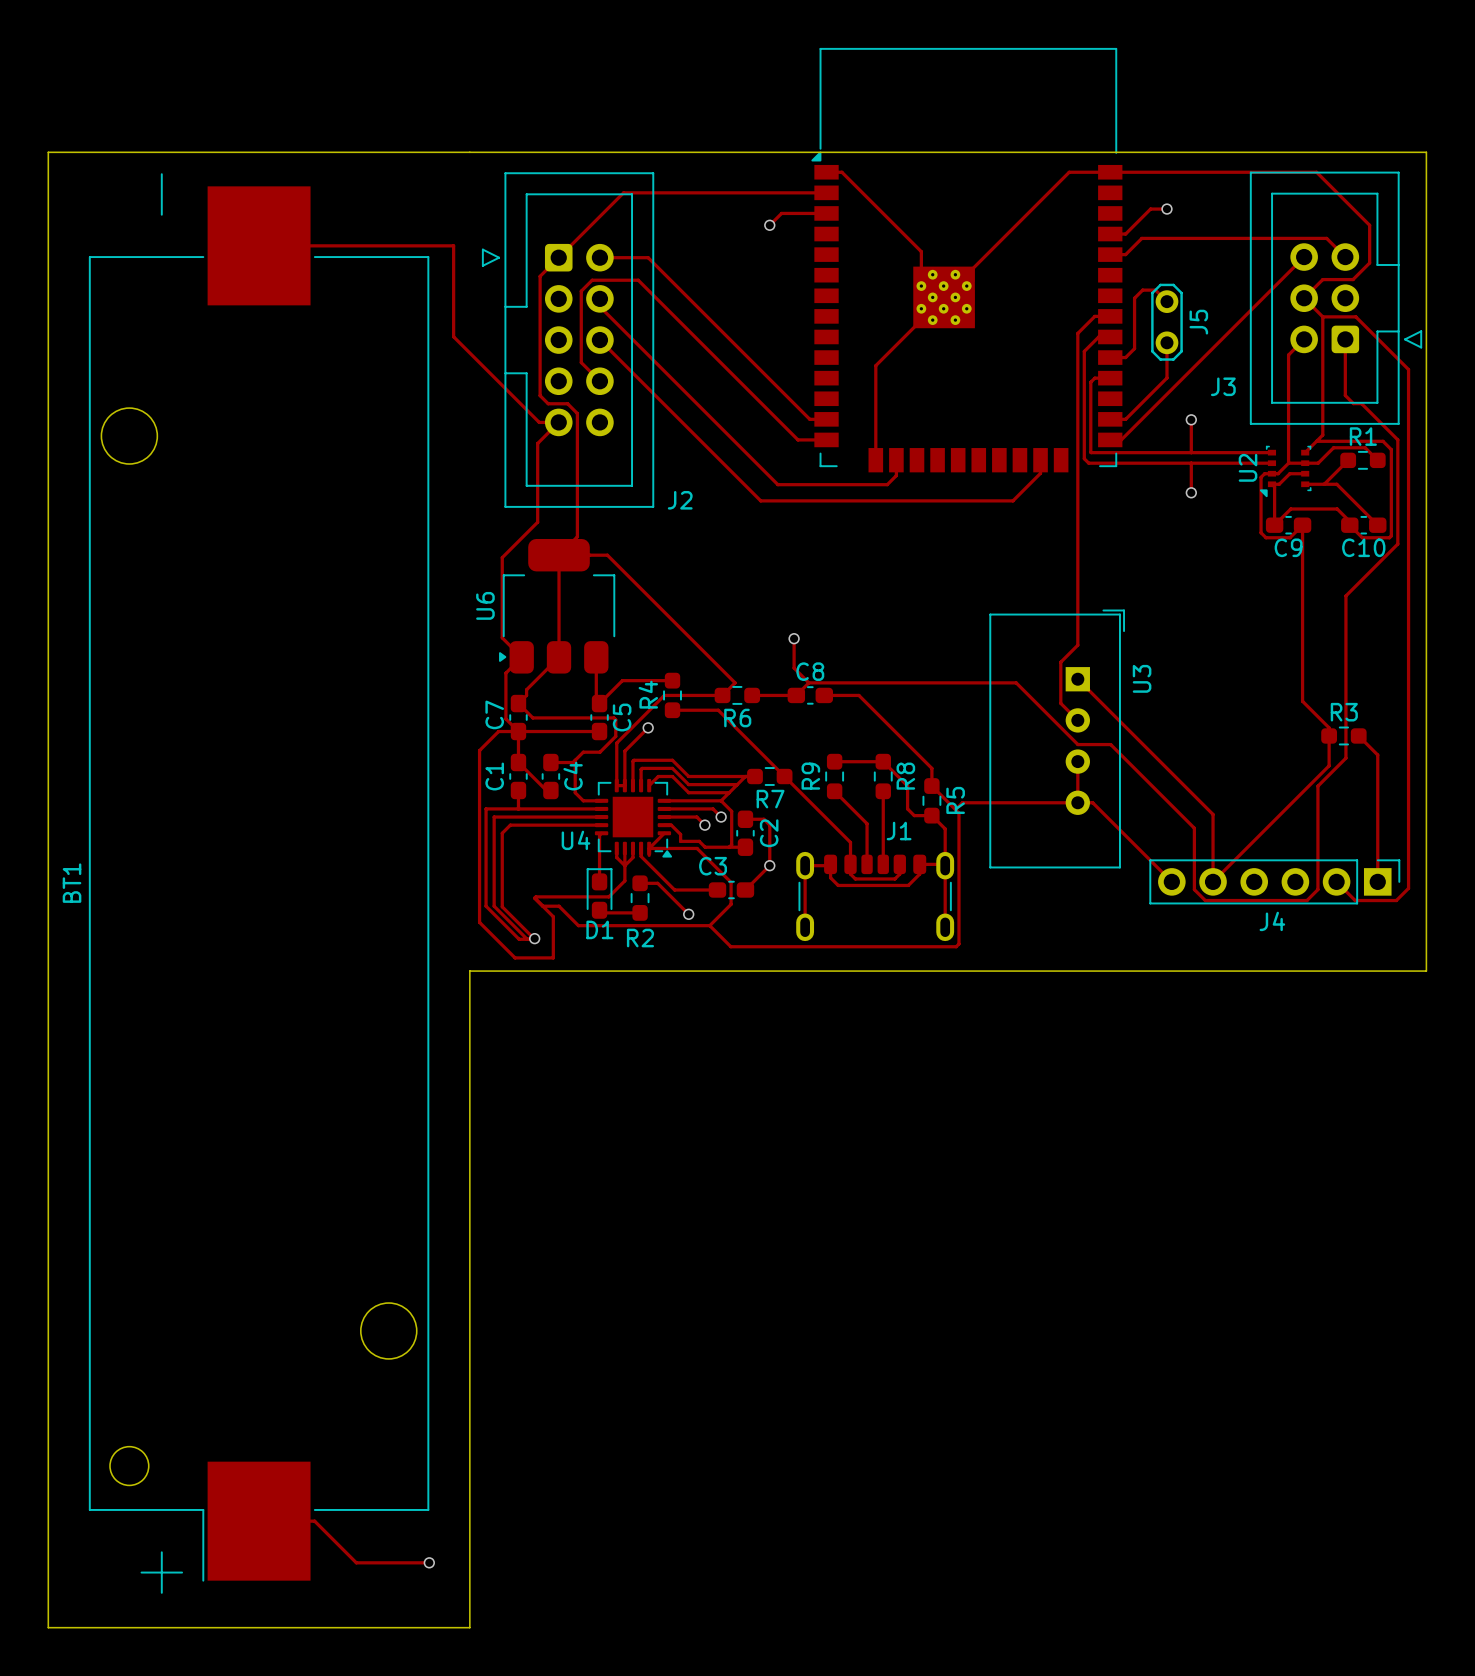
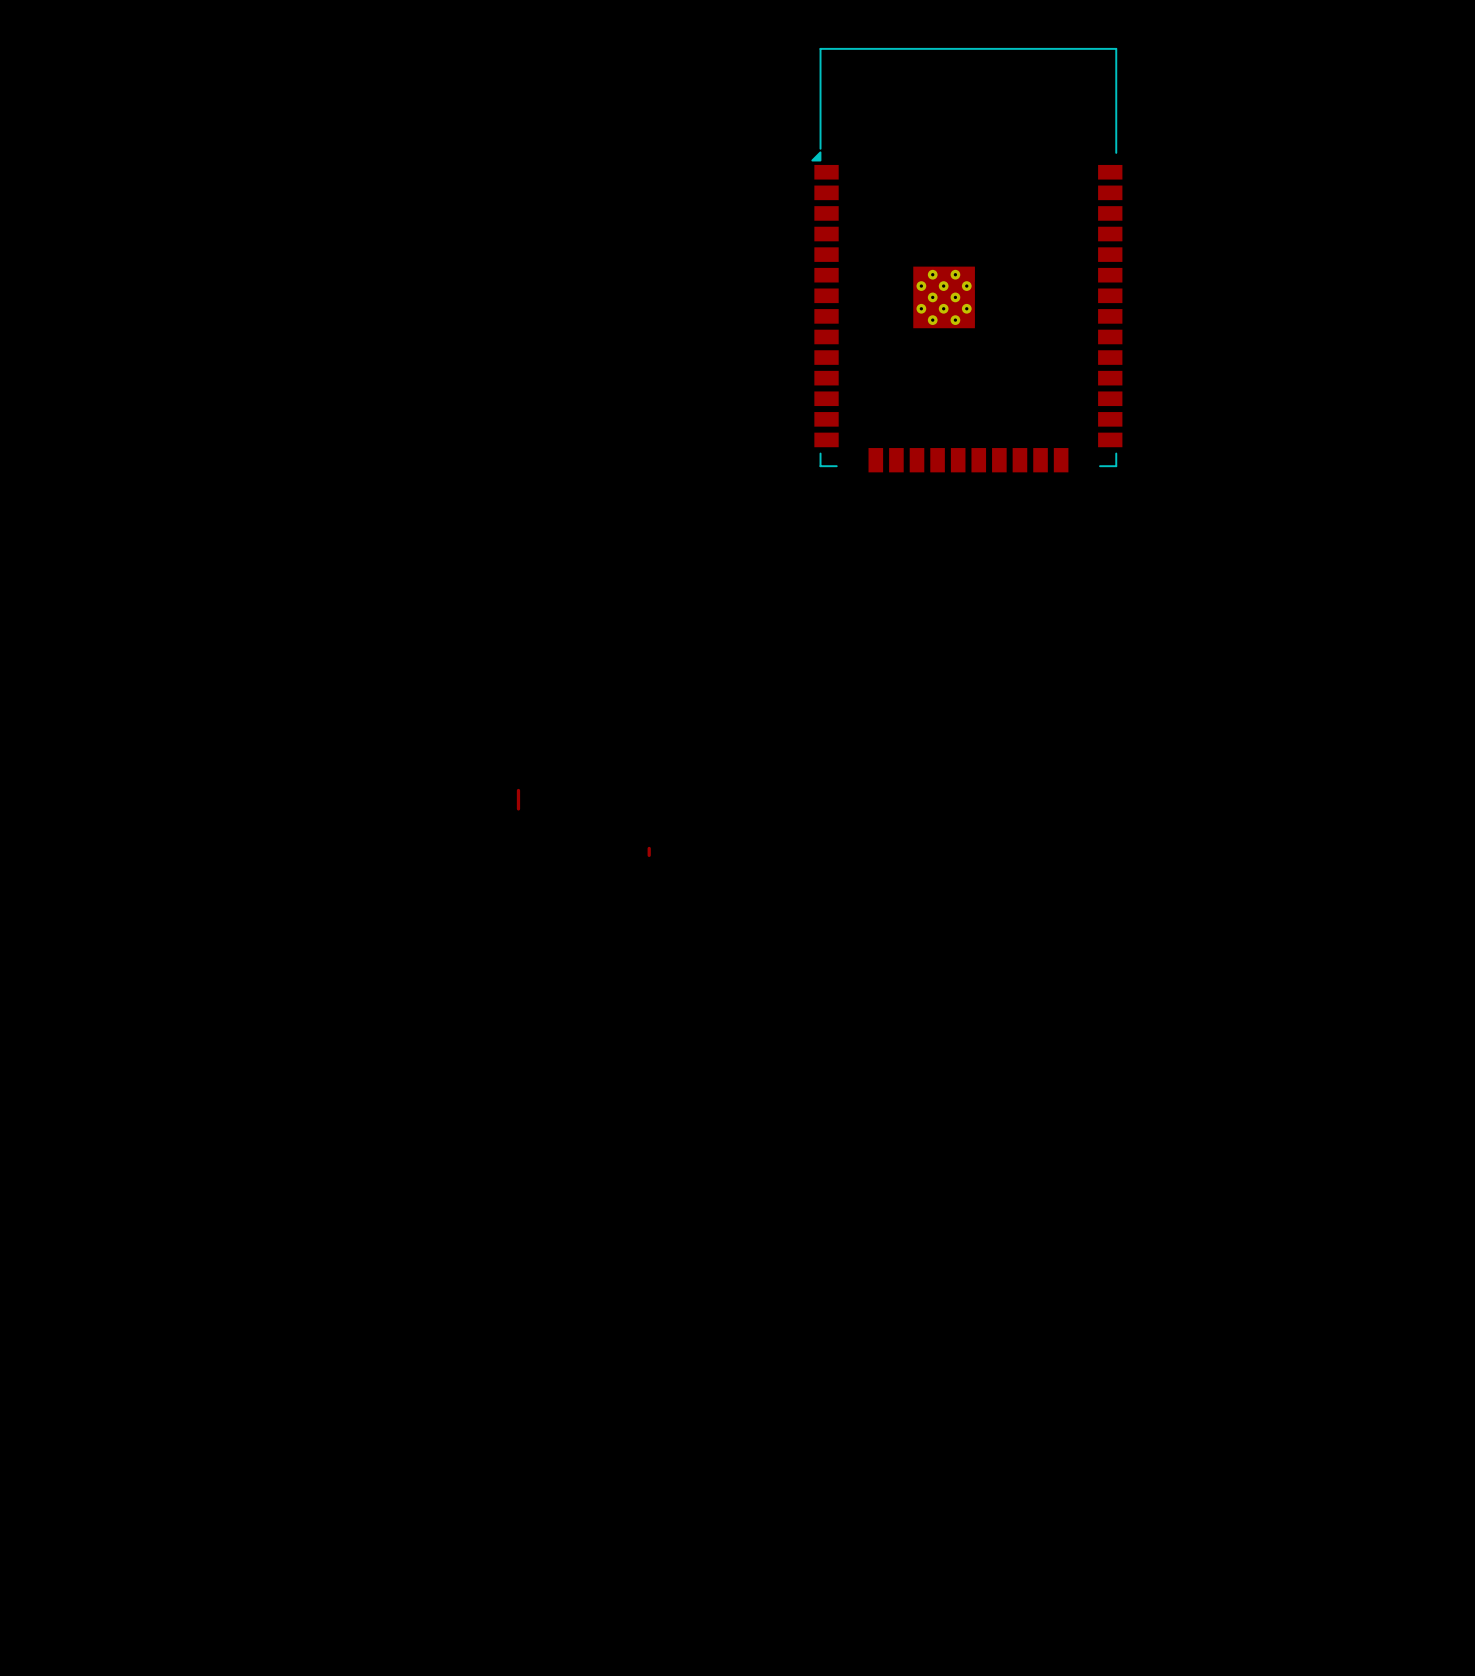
board edge: (48, 152) (1426, 152) (1426, 971) (469, 971) (469, 1627) (48, 1627) (48, 152) -> none
track: (826, 172) (841, 172) (921, 251) (921, 274) -> none
track: (826, 192) (623, 192) (540, 276) (540, 395) (548, 403) (567, 403) (577, 413) (577, 536) (559, 555) -> none
track: (1166, 209) (1150, 209) (1125, 234) (1110, 234) -> none
via: (1166, 209) -> none
track: (826, 213) (781, 213) (769, 225) -> none
via: (769, 225) -> none
track: (259, 245) (453, 245) (453, 336) (539, 422) (558, 422) (537, 443) (537, 522) (502, 557) (502, 637) (521, 657) (505, 673) (505, 718) (518, 731) (518, 762) (546, 790) (550, 790) -> none
track: (1110, 254) (1125, 254) (1141, 238) (1326, 238) (1345, 257) -> none
track: (599, 257) (648, 257) (809, 419) (826, 419) -> none
track: (1304, 257) (1121, 439) (1110, 439) -> none
track: (966, 274) (1069, 172) (1316, 172) (1369, 225) (1369, 262) (1353, 279) (1322, 279) (1304, 298) (1322, 316) -> none
track: (599, 298) (599, 306) (777, 484) (887, 484) (896, 475) (896, 460) -> none
J3: (1336, 298) -> none
track: (1166, 301) (1155, 290) (1142, 290) (1134, 298) (1134, 348) (1125, 357) (1110, 357) -> none
track: (1110, 316) (1094, 316) (1077, 333) (1077, 645) (1060, 662) (1060, 703) (1077, 720) -> none
track: (1322, 316) (1355, 316) (1408, 369) (1408, 888) (1396, 900) (1355, 900) (1336, 881) -> none
track: (1322, 316) (1322, 435) (1305, 452) -> none
track: (921, 320) (875, 365) (875, 460) -> none
J5: (1166, 322) -> none
track: (1110, 336) (1098, 336) (1084, 351) (1084, 458) (1088, 463) (1271, 463) -> none
track: (1304, 339) (1288, 354) (1288, 463) -> none
track: (1345, 339) (1345, 395) (1353, 403) (1361, 403) (1397, 439) (1397, 544) (1345, 595) (1345, 758) (1317, 786) (1317, 889) (1307, 900) (1205, 900) (1194, 889) (1194, 828) (1110, 744) (1077, 744) (1016, 682) (808, 682) -> none
J2: (568, 340) -> none
track: (599, 340) (760, 500) (1012, 500) (1040, 473) (1040, 460) -> none
track: (1166, 342) (1166, 377) (1125, 419) (1110, 419) -> none
track: (1110, 378) (1094, 378) (1090, 382) (1091, 452) (1271, 452) -> none
track: (599, 381) (581, 362) (581, 291) (592, 280) (638, 280) (797, 439) (826, 439) -> none
track: (1191, 419) (1191, 452) -> none
via: (1191, 419) -> none
track: (1316, 441) (1383, 441) (1391, 449) (1391, 535) (1389, 537) (1362, 537) (1337, 508) (1290, 508) (1274, 525) (1274, 486) (1271, 484) (1279, 484) (1289, 473) (1305, 473) -> none
track: (1348, 460) (1324, 484) -> none
R1: (1362, 460) -> none
track: (1377, 460) (1365, 447) (1333, 447) (1318, 463) (1288, 463) -> none
track: (1191, 463) (1191, 492) -> none
track: (1288, 463) (1278, 473) (1264, 473) (1261, 477) (1261, 532) (1266, 537) (1290, 537) (1302, 525) (1302, 701) (1329, 727) (1329, 765) (1213, 881) (1213, 814) (1077, 679) -> none
U2: (1285, 471) -> none
track: (1305, 484) (1336, 484) (1377, 525) -> none
via: (1191, 492) -> none
C9: (1288, 525) -> none
C10: (1363, 525) -> none
track: (559, 555) (559, 657) (526, 689) (526, 695) (518, 703) (532, 717) (613, 717) (615, 719) (615, 736) (600, 752) (583, 752) (572, 762) (550, 762) -> none
track: (559, 555) (607, 555) (735, 682) (722, 695) (664, 695) (616, 743) (616, 785) (624, 785) (624, 751) (648, 727) -> none
U6: (557, 606) -> none
track: (794, 638) (794, 668) (808, 682) -> none
via: (794, 638) -> none
track: (596, 657) (596, 700) (599, 703) (622, 680) (672, 680) -> none
track: (808, 682) (796, 695) (752, 695) -> none
R4: (672, 695) -> none
R6: (737, 695) -> none
C8: (810, 695) -> none
track: (824, 695) (858, 695) (931, 768) (931, 786) (958, 813) (958, 943) (956, 946) (730, 946) (709, 925) -> none
track: (673, 711) (672, 710) (718, 710) (850, 842) (850, 874) (855, 878) (894, 878) (899, 874) (899, 857) -> none
C7: (518, 717) -> none
C5: (599, 717) -> none
via: (648, 727) -> none
track: (599, 731) (498, 731) (479, 750) (479, 922) (515, 957) (553, 957) (553, 916) (534, 898) (608, 896) (624, 880) (624, 848) -> none
R3: (1343, 735) -> none
track: (1358, 735) (1377, 755) (1377, 881) -> none
U3: (1057, 738) -> none
track: (575, 760) (575, 792) (583, 800) (601, 800) -> none
track: (834, 761) (883, 761) (907, 786) (907, 808) (914, 815) (931, 815) (945, 828) (945, 927) -> none
track: (1077, 761) (1077, 802) -> none
C1: (518, 776) -> none
C4: (550, 776) -> none
track: (745, 776) (721, 800) -> none
track: (754, 776) (688, 776) (672, 760) (633, 760) (632, 785) -> none
R7: (769, 776) -> none
R9: (834, 776) -> none
R8: (883, 776) -> none
track: (737, 784) (688, 784) (672, 768) (642, 768) (641, 785) -> none
track: (649, 785) (658, 776) (672, 776) (688, 792) (729, 792) -> none
track: (834, 791) (867, 823) (867, 864) -> none
track: (883, 791) (883, 864) -> none
track: (664, 800) (721, 800) -> none
track: (721, 800) (731, 811) (731, 844) (729, 847) -> none
R5: (931, 800) -> none
track: (601, 808) (486, 808) (486, 906) (519, 939) (534, 939) (502, 906) (502, 833) (510, 825) (601, 825) -> none
track: (664, 808) (713, 808) (721, 817) -> none
track: (955, 809) (962, 802) (1092, 802) (1171, 881) -> none
track: (601, 817) (494, 817) (494, 906) (527, 939) -> none
track: (664, 817) (696, 817) (704, 825) -> none
via: (721, 817) -> none
U4: (633, 818) -> none
track: (745, 819) (763, 819) (769, 825) (769, 865) (745, 889) -> none
track: (664, 825) (671, 825) (680, 834) (680, 841) (699, 841) (705, 847) (745, 847) -> none
via: (704, 825) -> none
track: (601, 833) (599, 835) (599, 881) -> none
track: (664, 833) (649, 848) (697, 848) (731, 882) (731, 904) (709, 925) -> none
C2: (745, 833) -> none
track: (616, 848) (616, 857) (624, 865) (632, 857) (632, 848) -> none
track: (641, 848) (641, 856) (674, 889) (717, 889) -> none
via: (769, 865) -> none
track: (945, 865) (919, 864) (919, 874) (908, 885) (838, 885) (830, 877) (830, 864) (805, 865) (805, 927) -> none
J4: (1274, 881) -> none
BT1: (259, 883) -> none
track: (640, 883) (657, 883) (688, 914) -> none
C3: (731, 889) -> none
D1: (599, 893) -> none
J1: (875, 896) -> none
R2: (640, 898) -> none
track: (542, 906) (559, 906) (578, 925) (709, 925) -> none
track: (599, 910) (602, 912) (640, 912) -> none
via: (688, 914) -> none
via: (534, 938) -> none
track: (259, 1521) (314, 1521) (356, 1562) (429, 1562) -> none
via: (429, 1562) -> none

